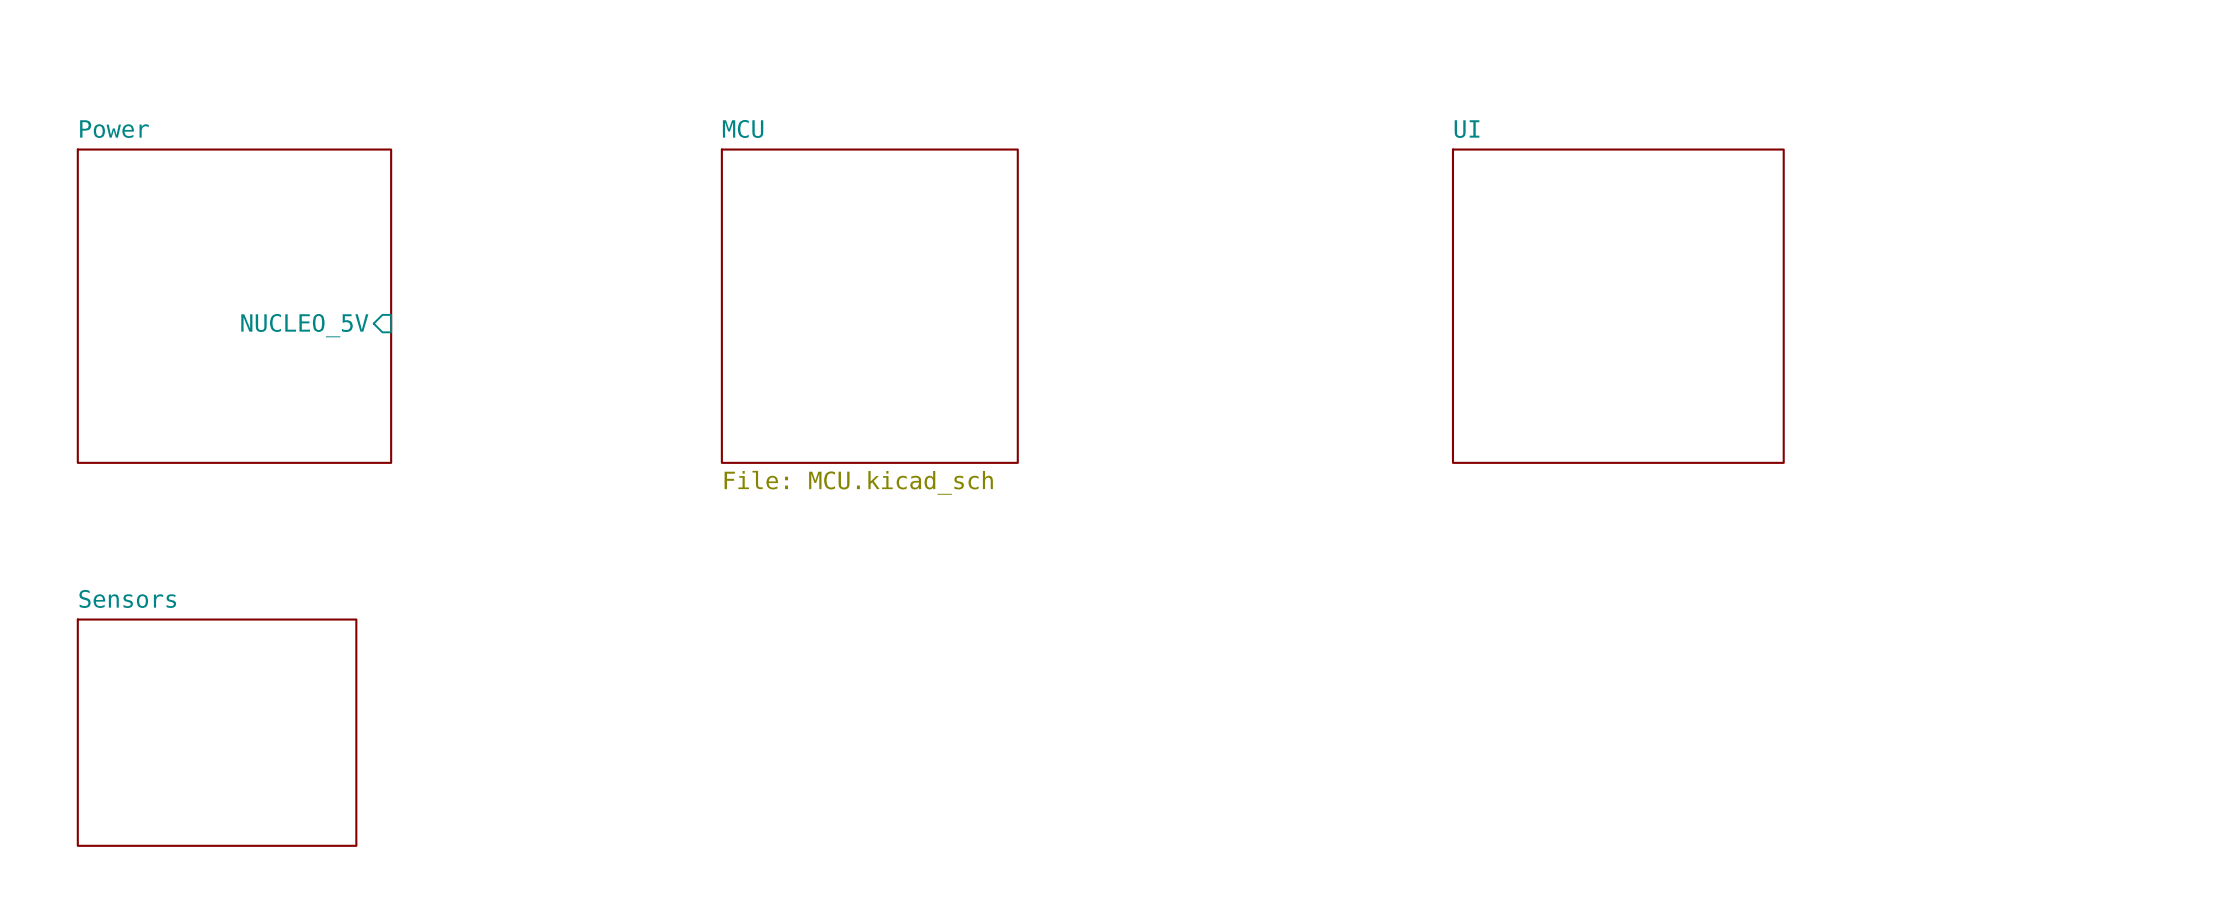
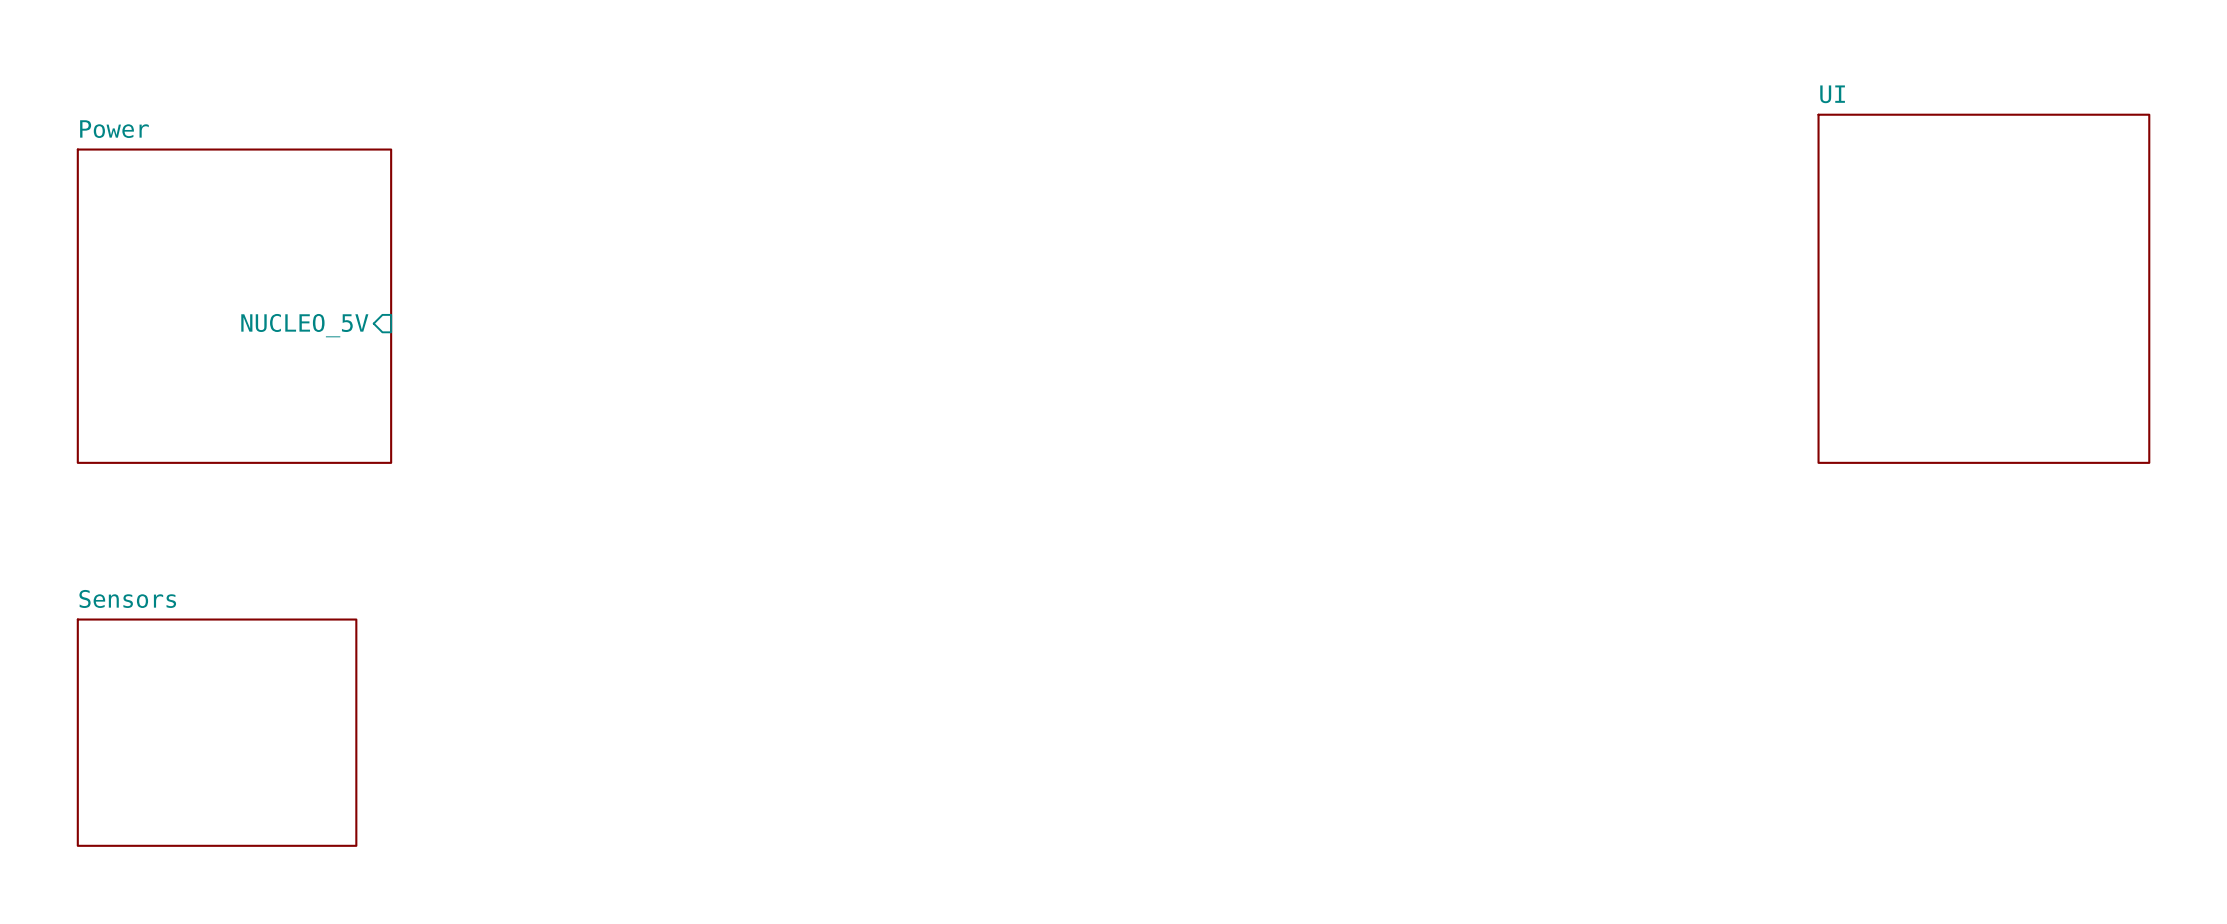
sheet UI: none -> (1983, 288)
sheet MCU: File: MCU.kicad_sch (869, 306) -> none
sheet UI: (1618, 306) -> none

